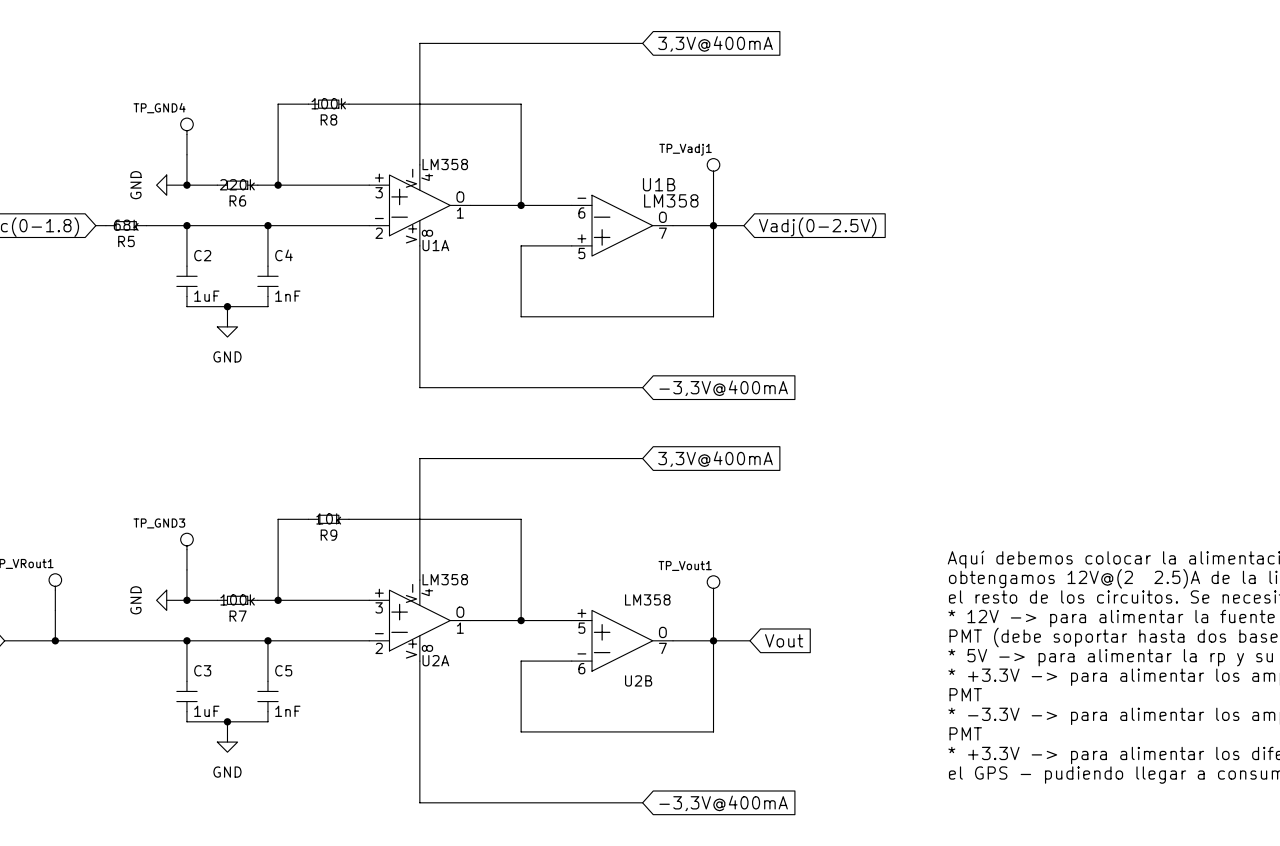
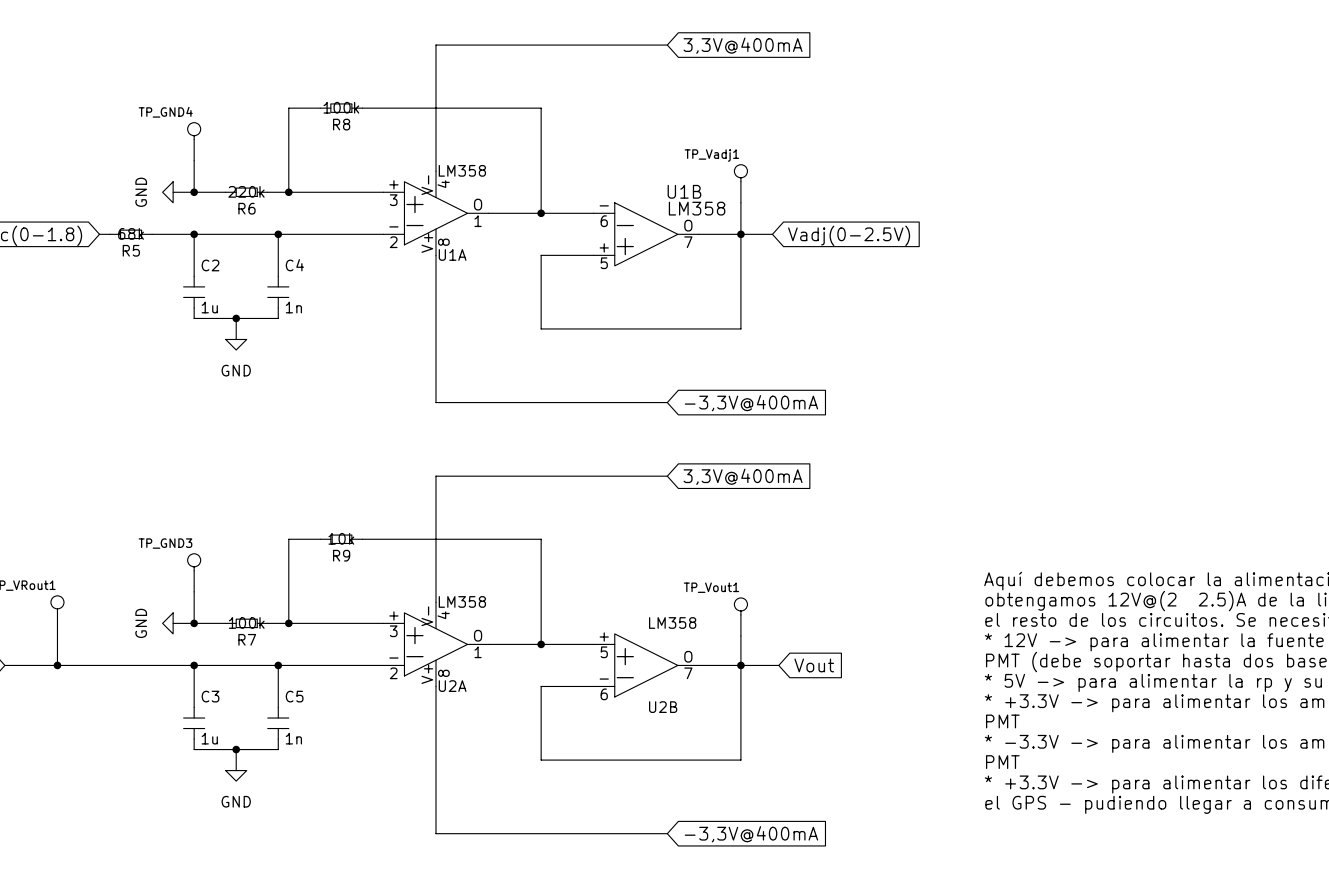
C2 value: 1uF (206, 296) -> 1u (209, 307)
C4 value: 1nF (287, 296) -> 1n (293, 307)
C3 value: 1uF (206, 711) -> 1u (209, 738)
C5 value: 1nF (287, 711) -> 1n (293, 738)

